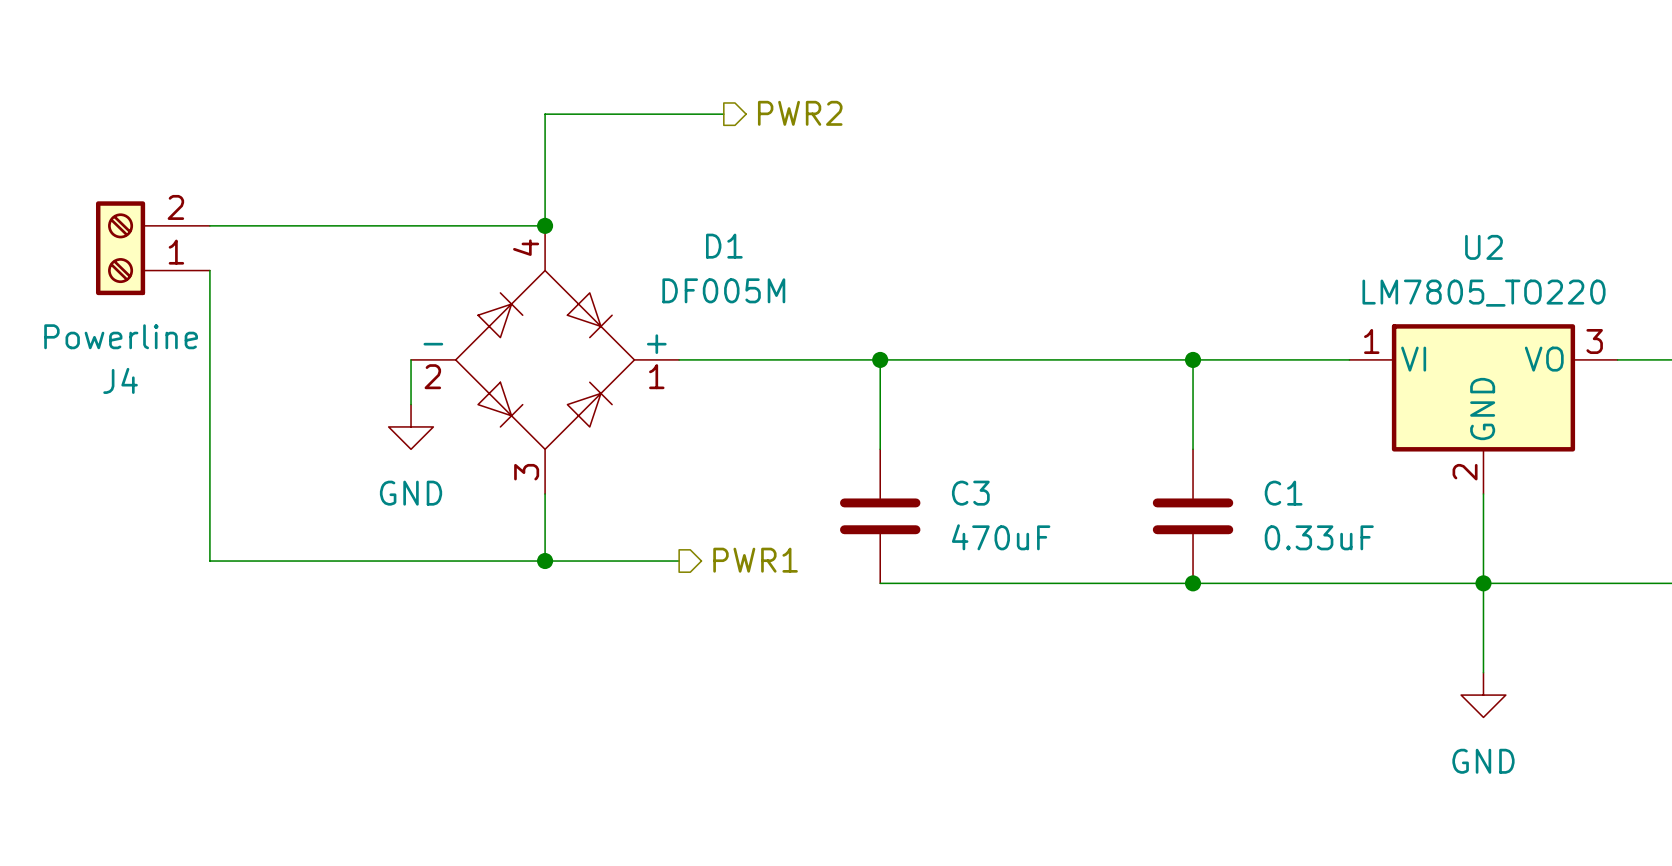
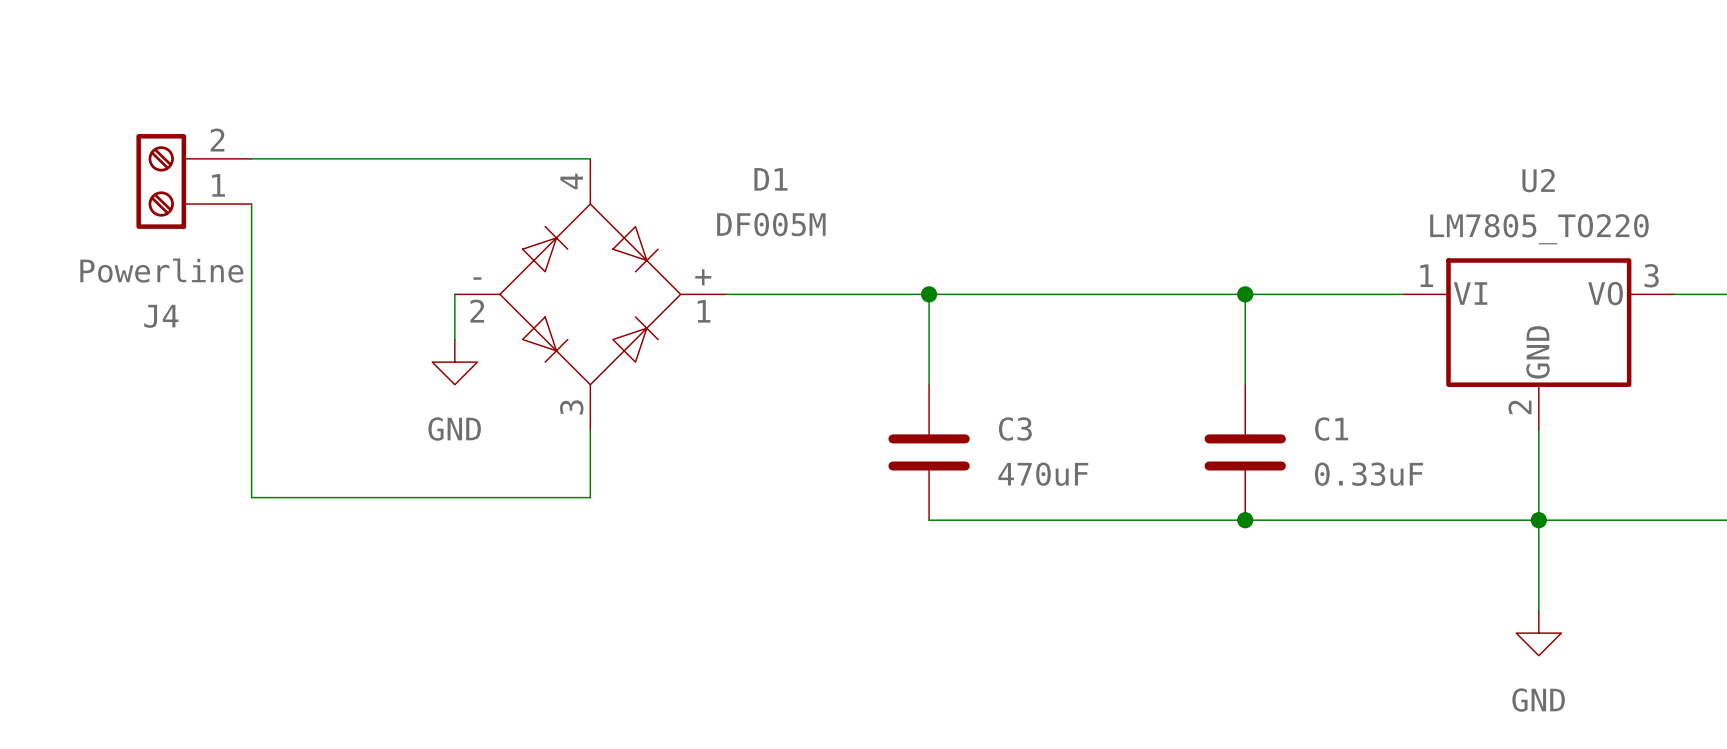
hierarchical label: PWR2 (800, 113) -> none
wire: (723, 114) (545, 114) (545, 225) -> none
junction: (545, 225) -> none
hierarchical label: PWR1 (755, 560) -> none
wire: (545, 561) (679, 561) -> none
junction: (545, 561) -> none

